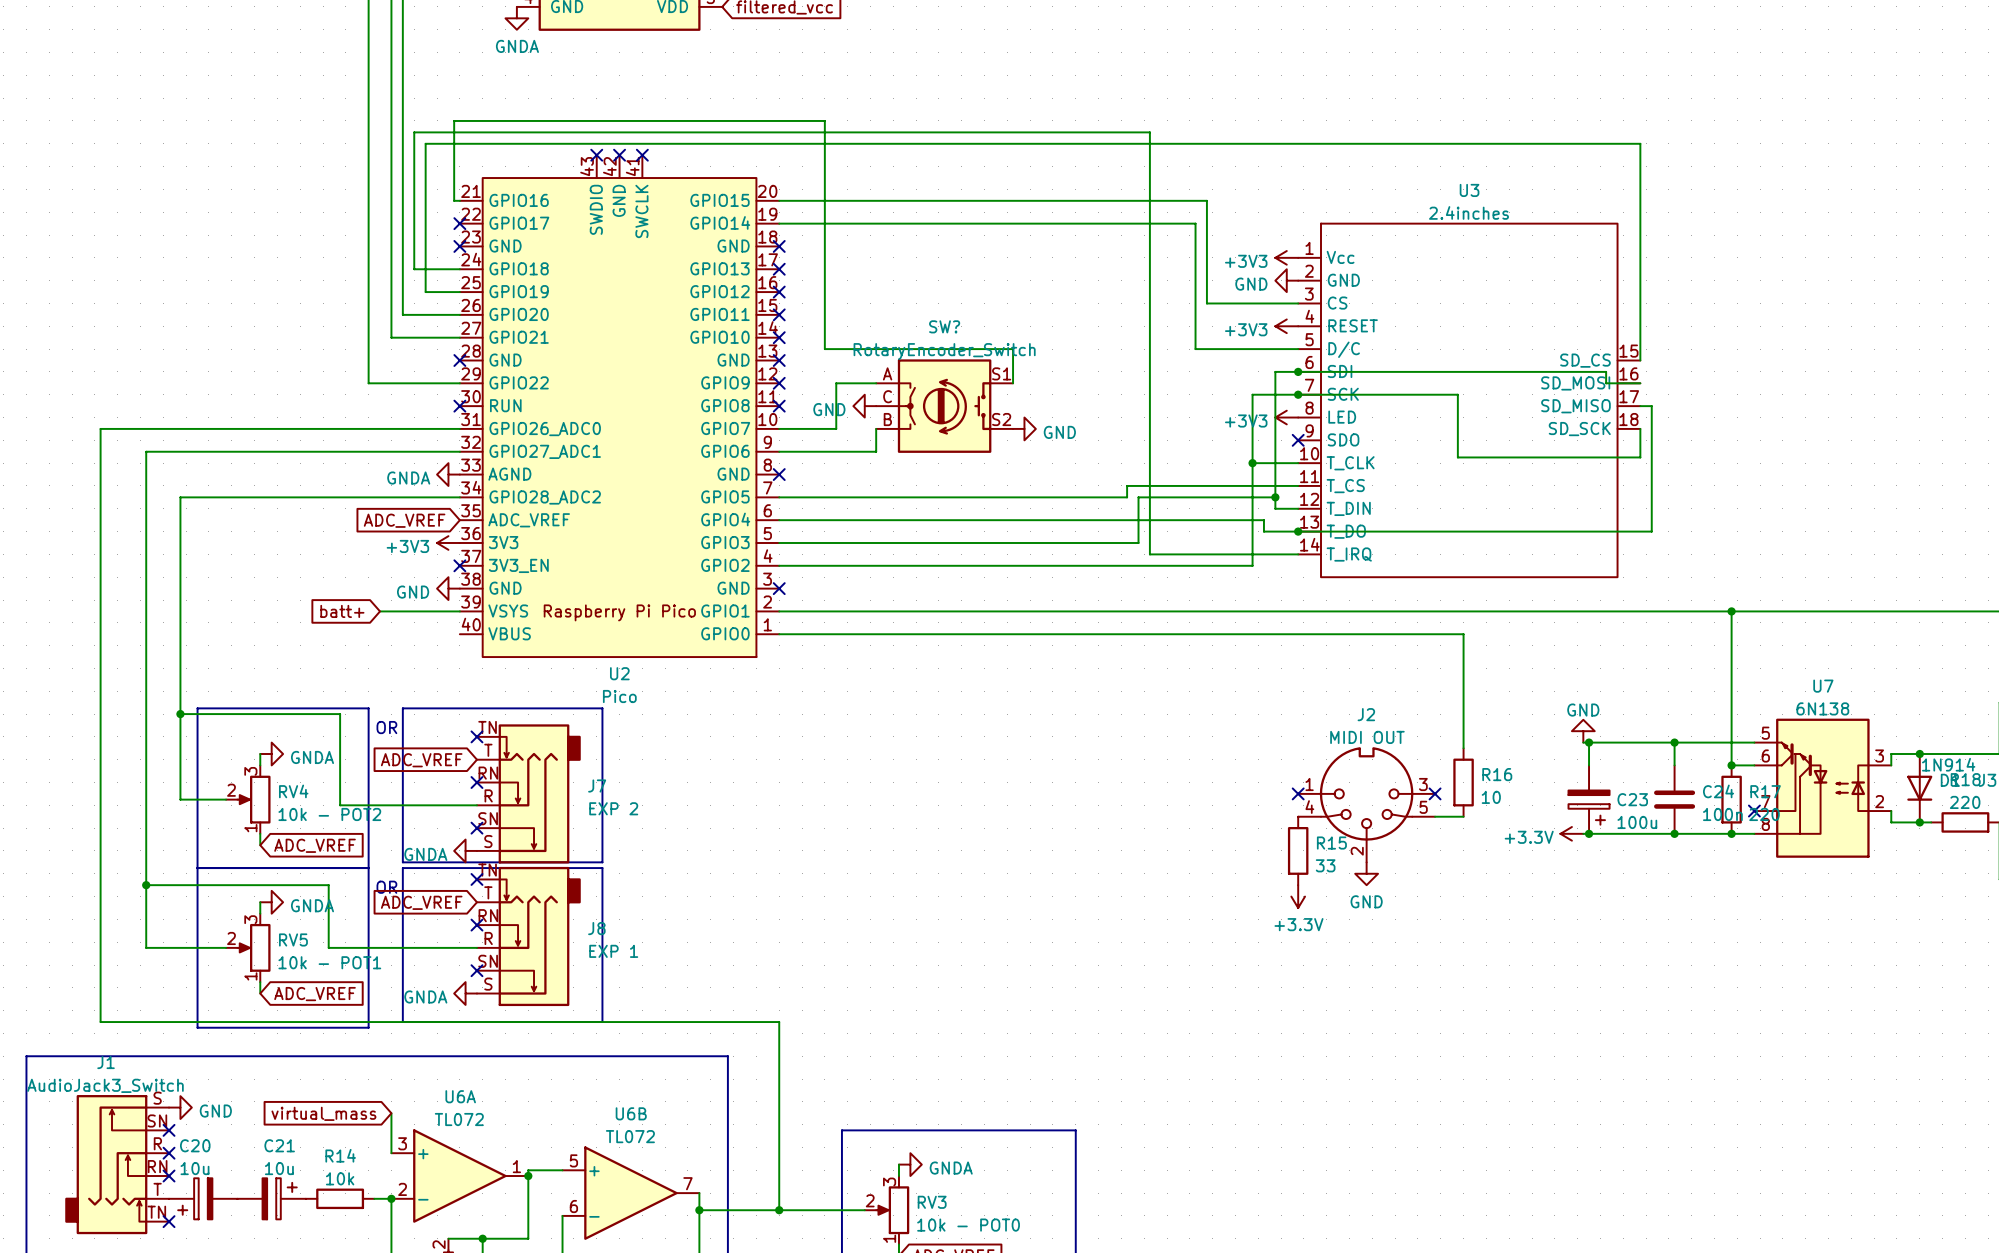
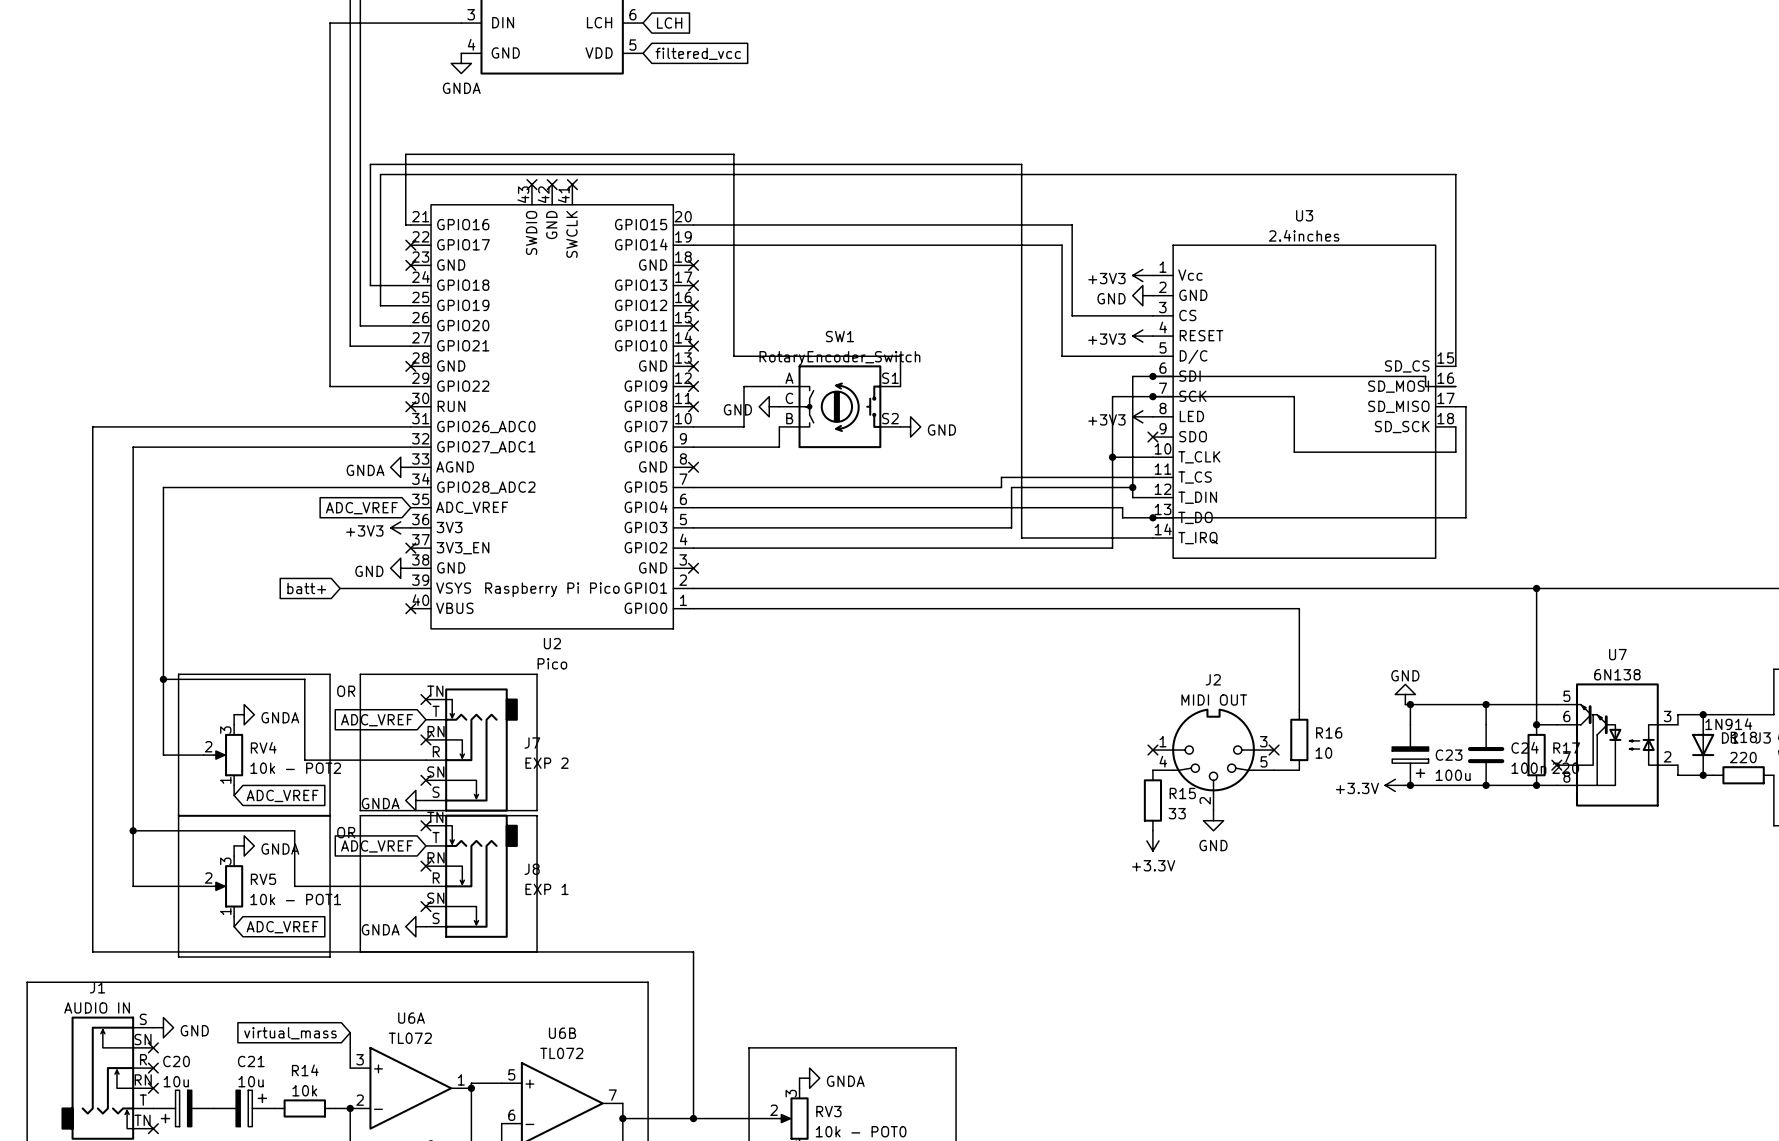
SW? name: SW? (944, 326) -> SW1 (839, 336)
no-connect mark: none -> (410, 608)
J1 value: AudioJack3_Switch (105, 1085) -> AUDIO IN (97, 1007)

